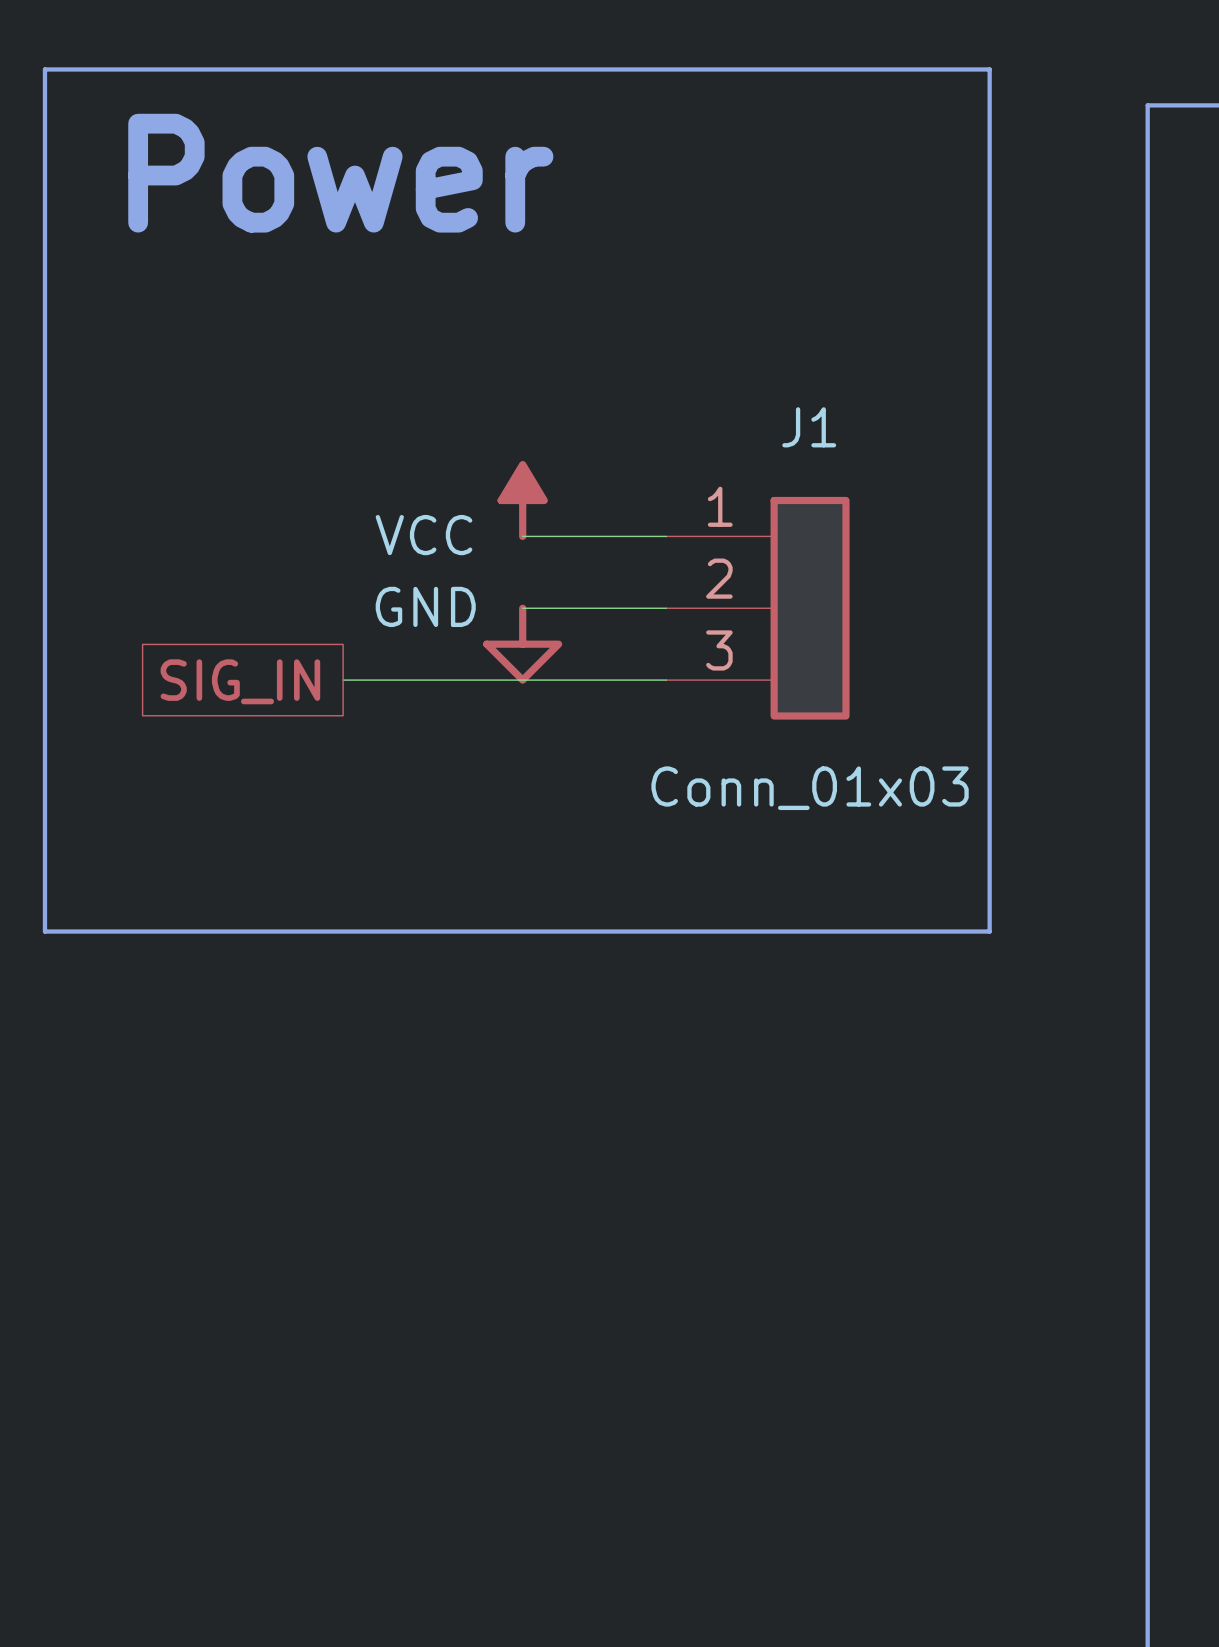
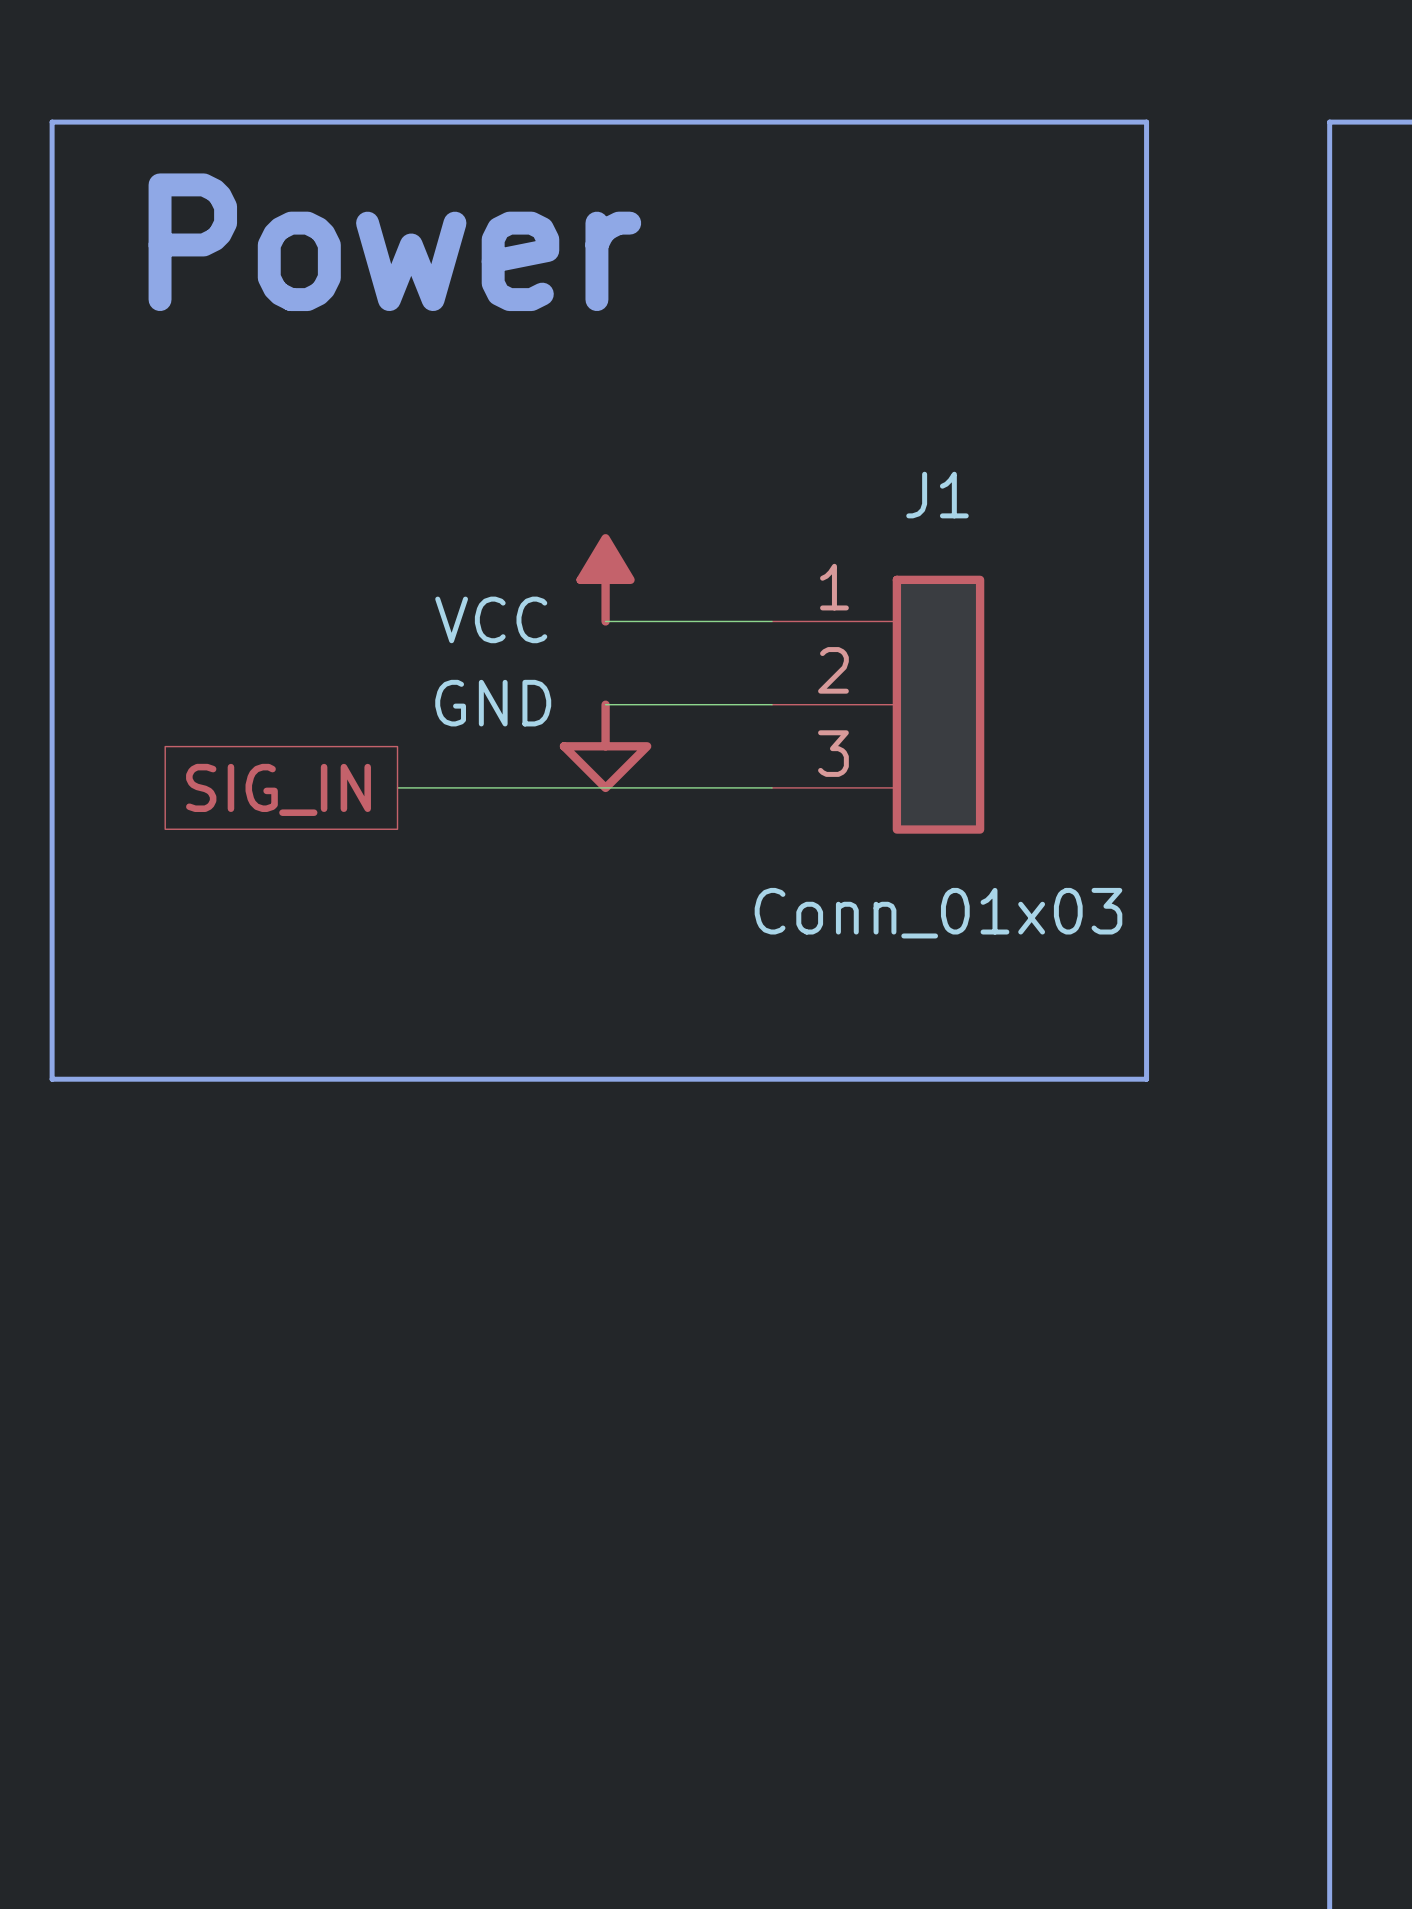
line: (44, 105) (44, 69) (989, 69) (989, 105) -> (52, 122) (1146, 122)
text position: Power (340, 173) -> Power (394, 242)

